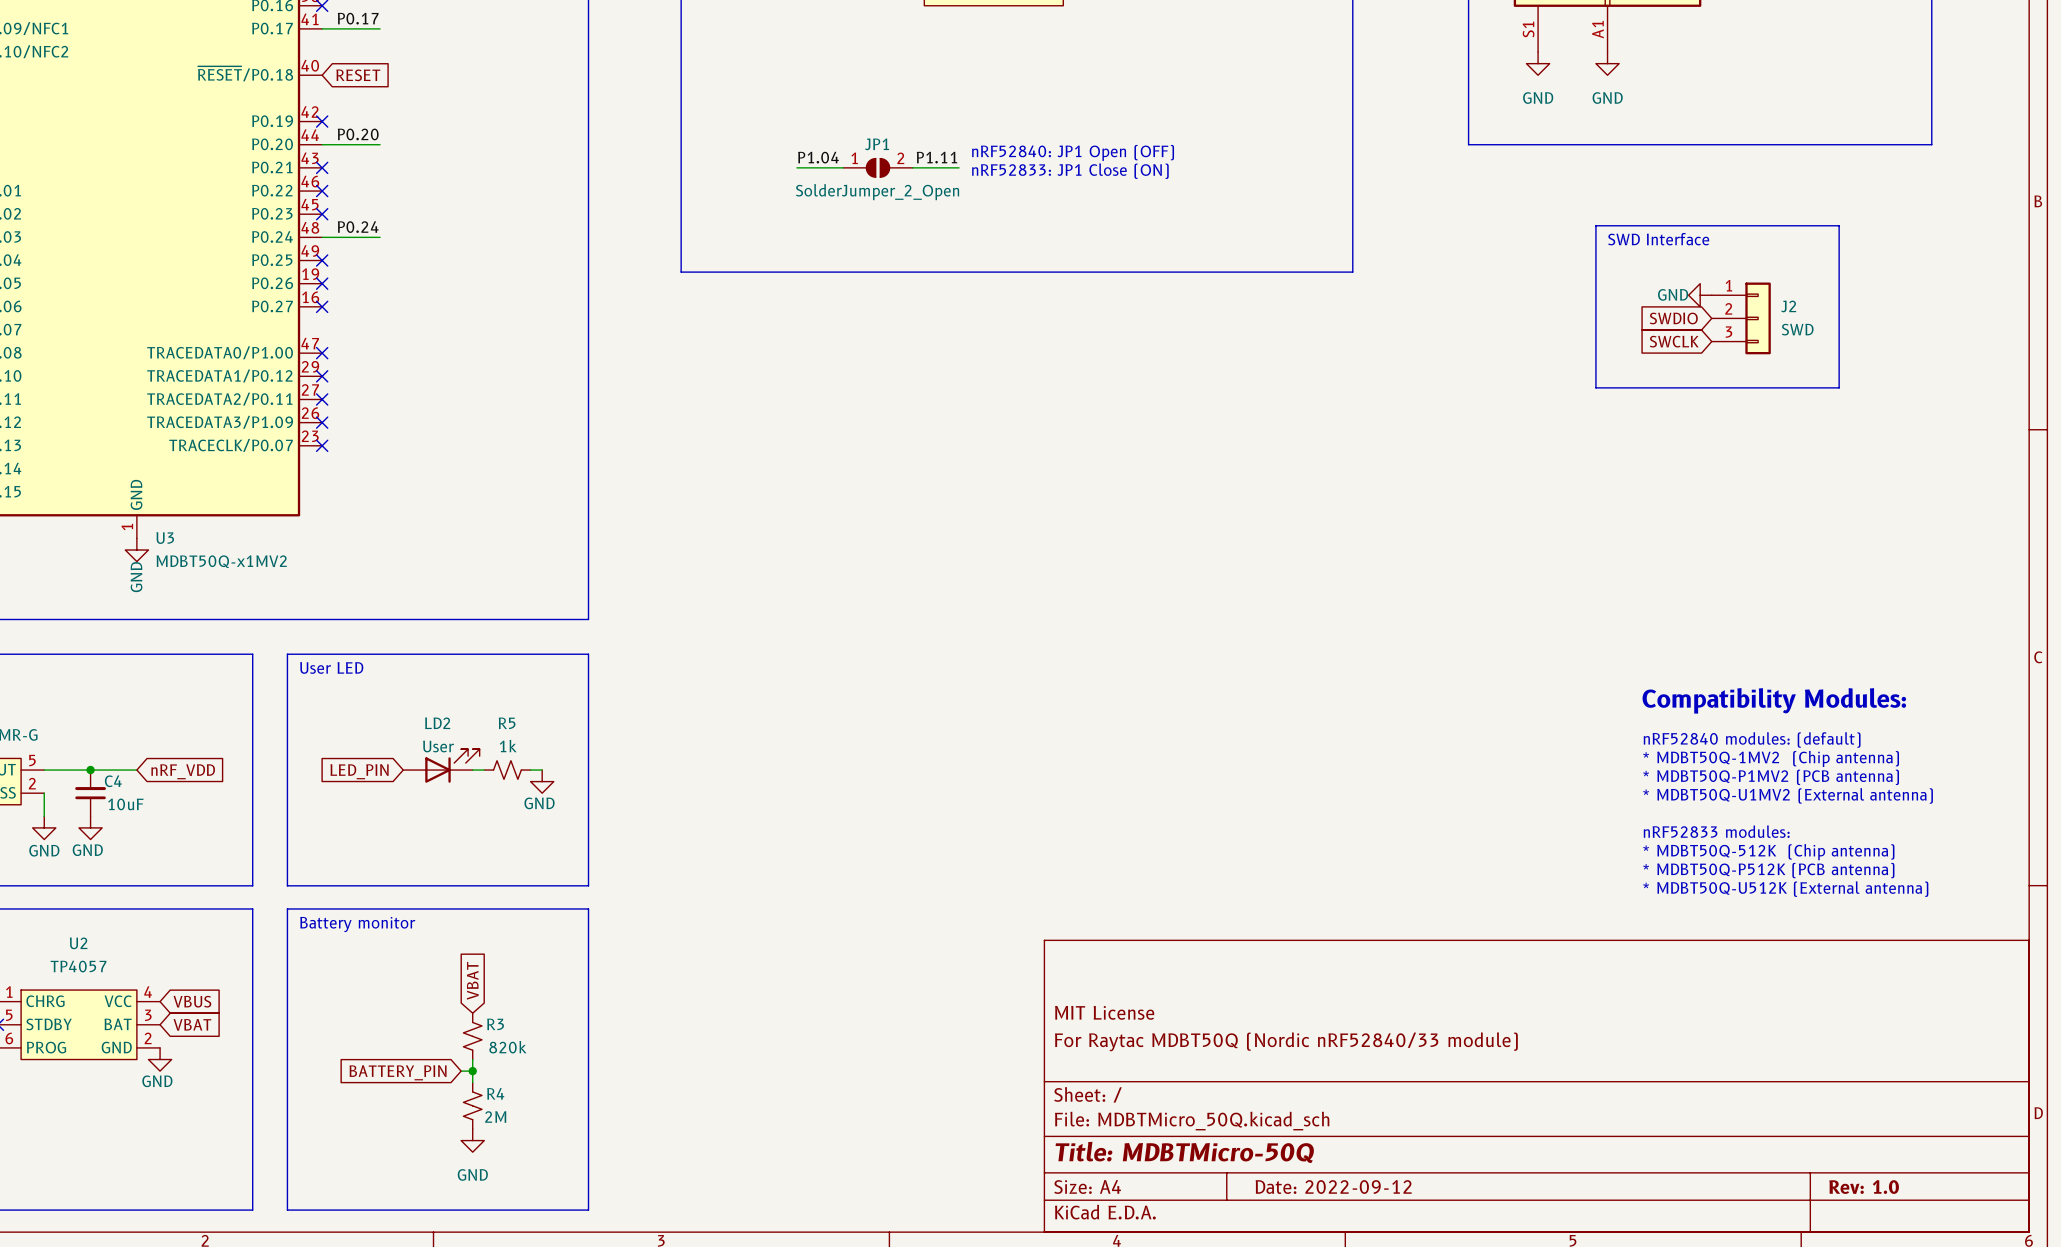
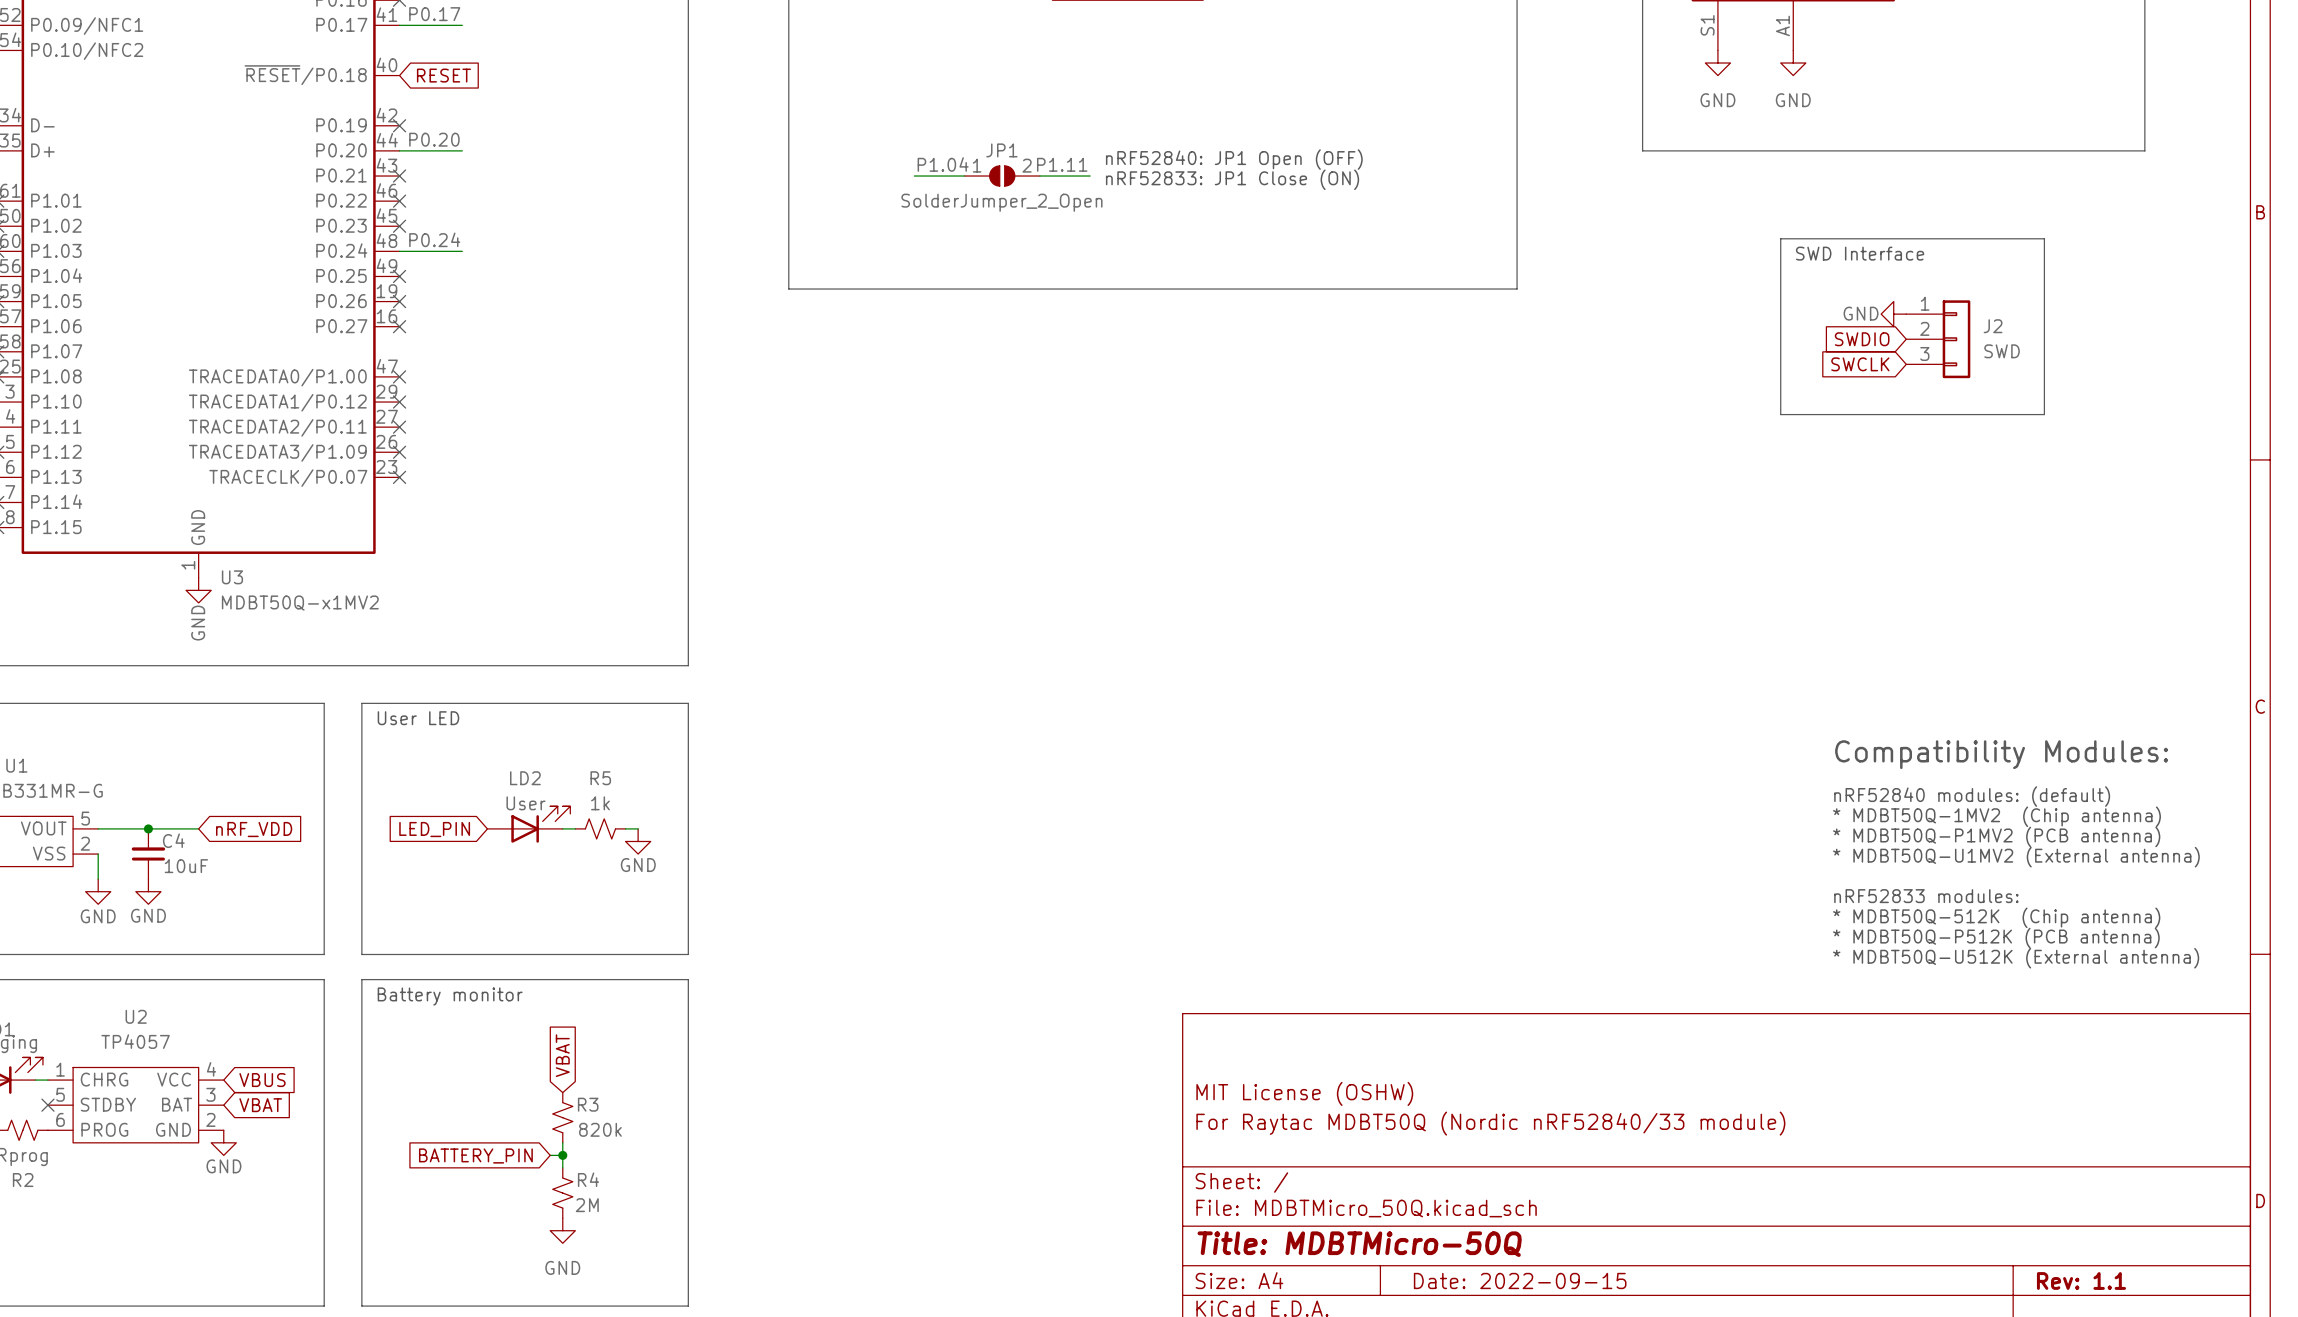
title block: MIT License (1104, 1012) -> MIT License (OSHW) (1304, 1093)
title block: Date: 2022-09-12 (1333, 1187) -> Date: 2022-09-15 (1520, 1280)
title block: Rev: 1.0 (1864, 1187) -> Rev: 1.1 (2081, 1280)

